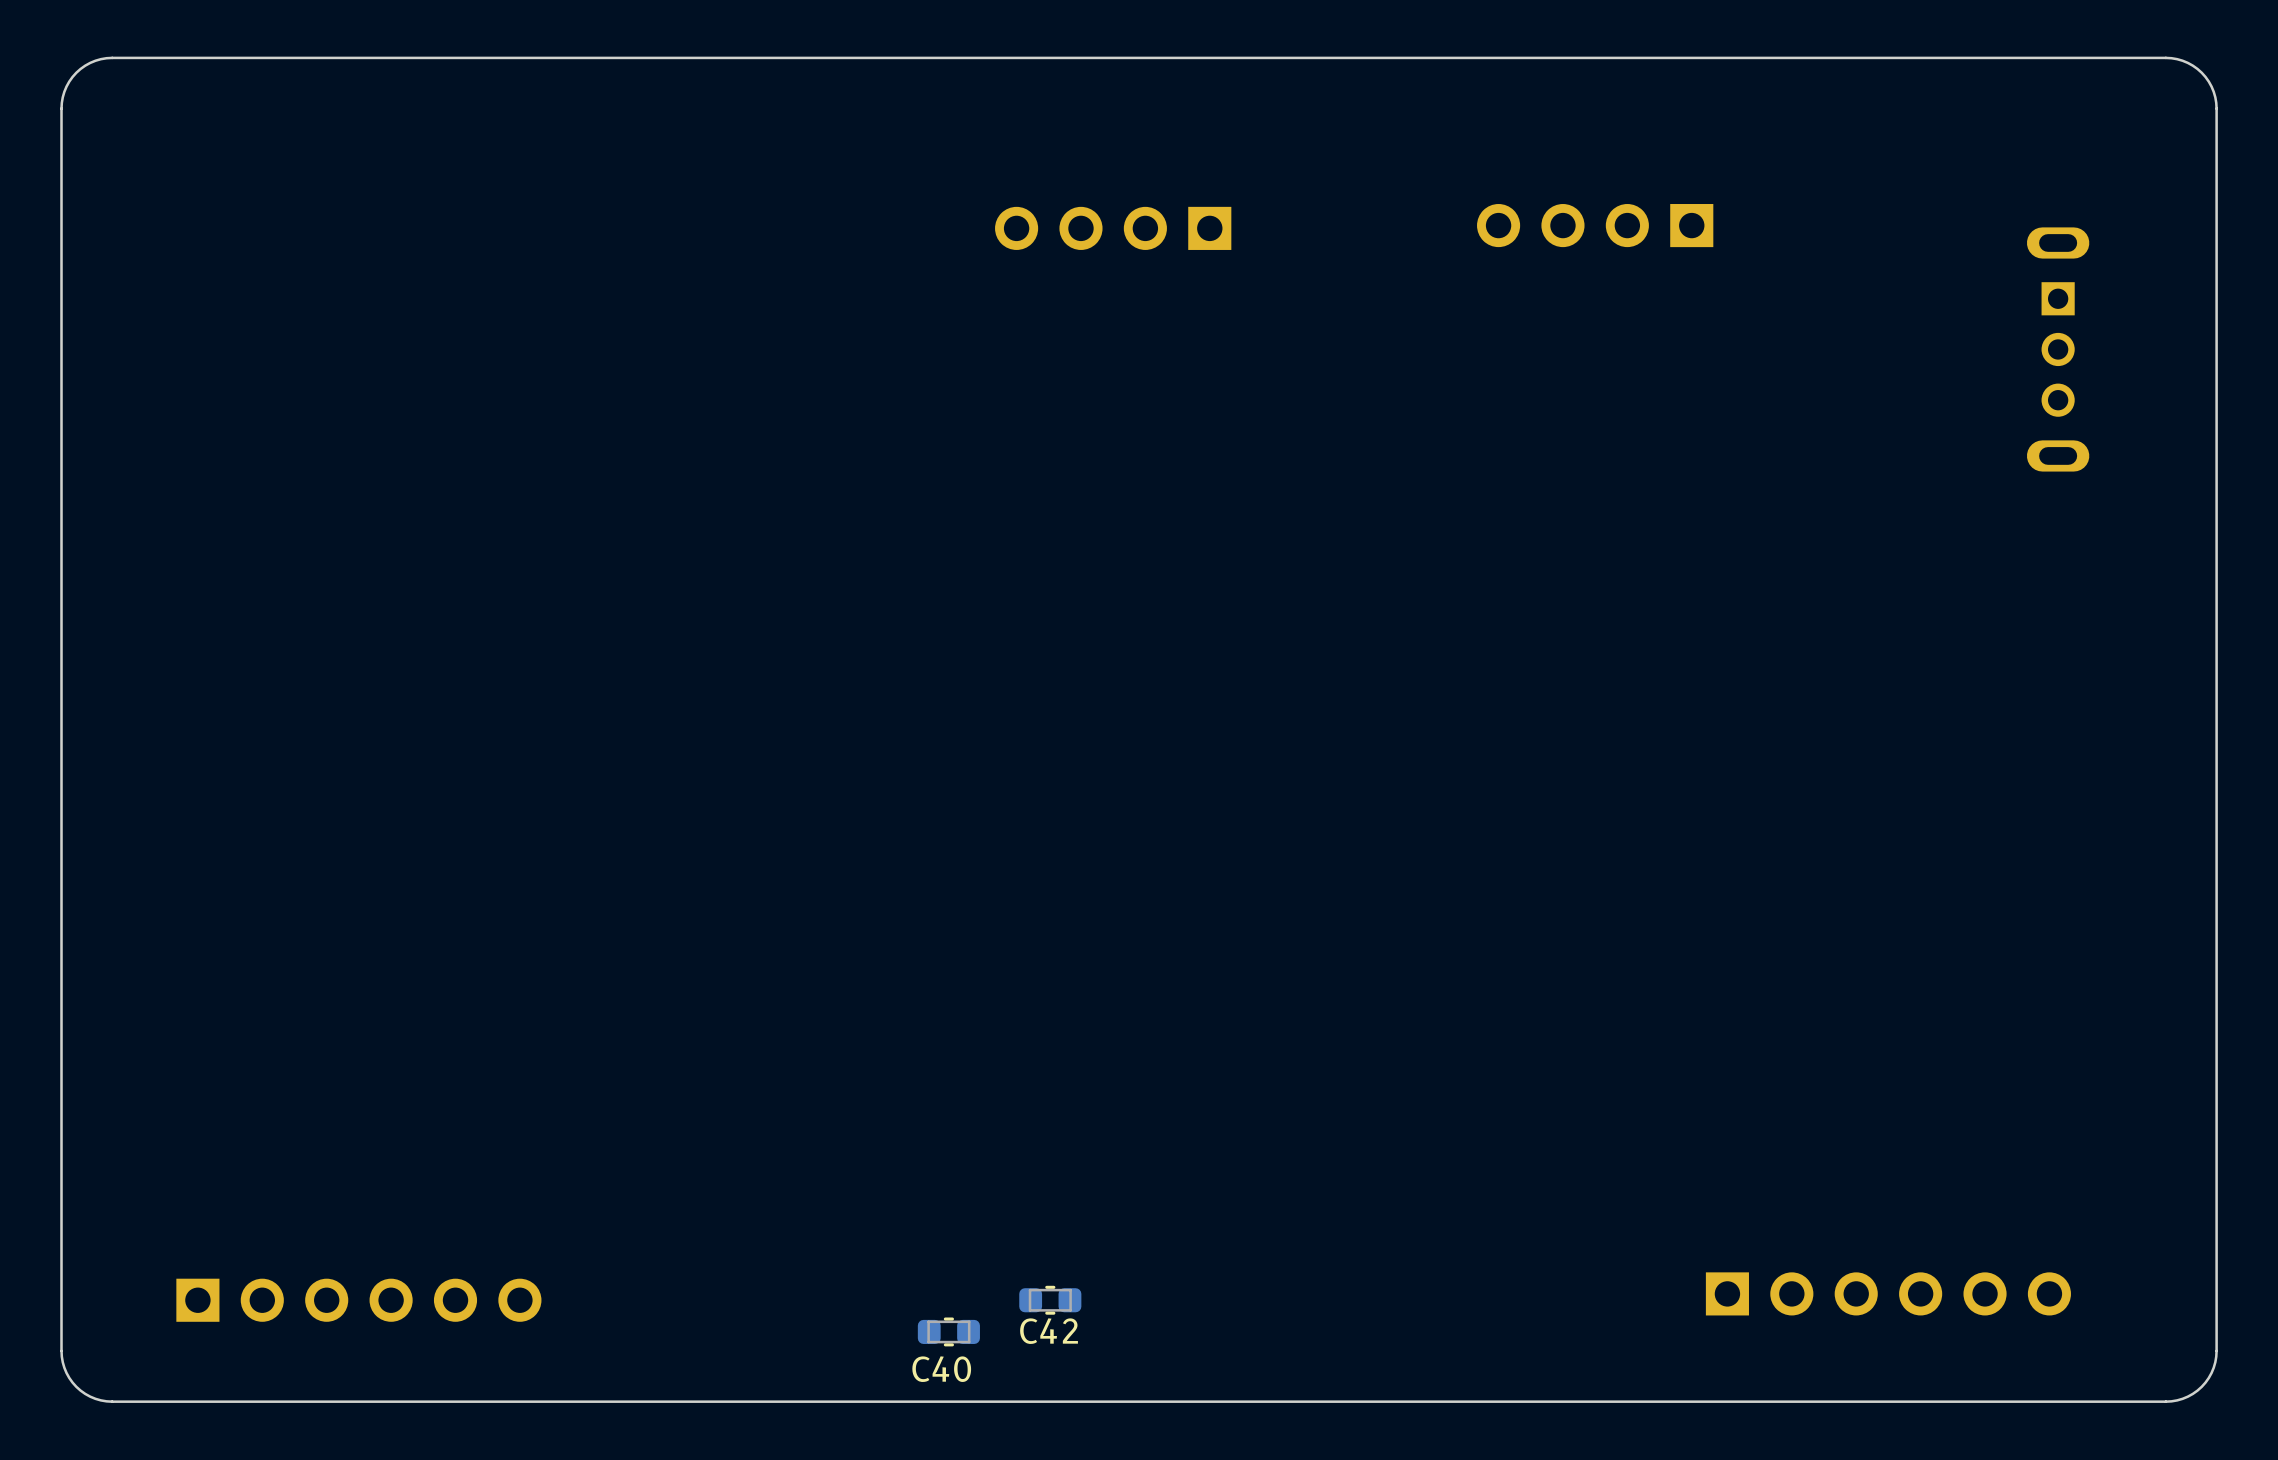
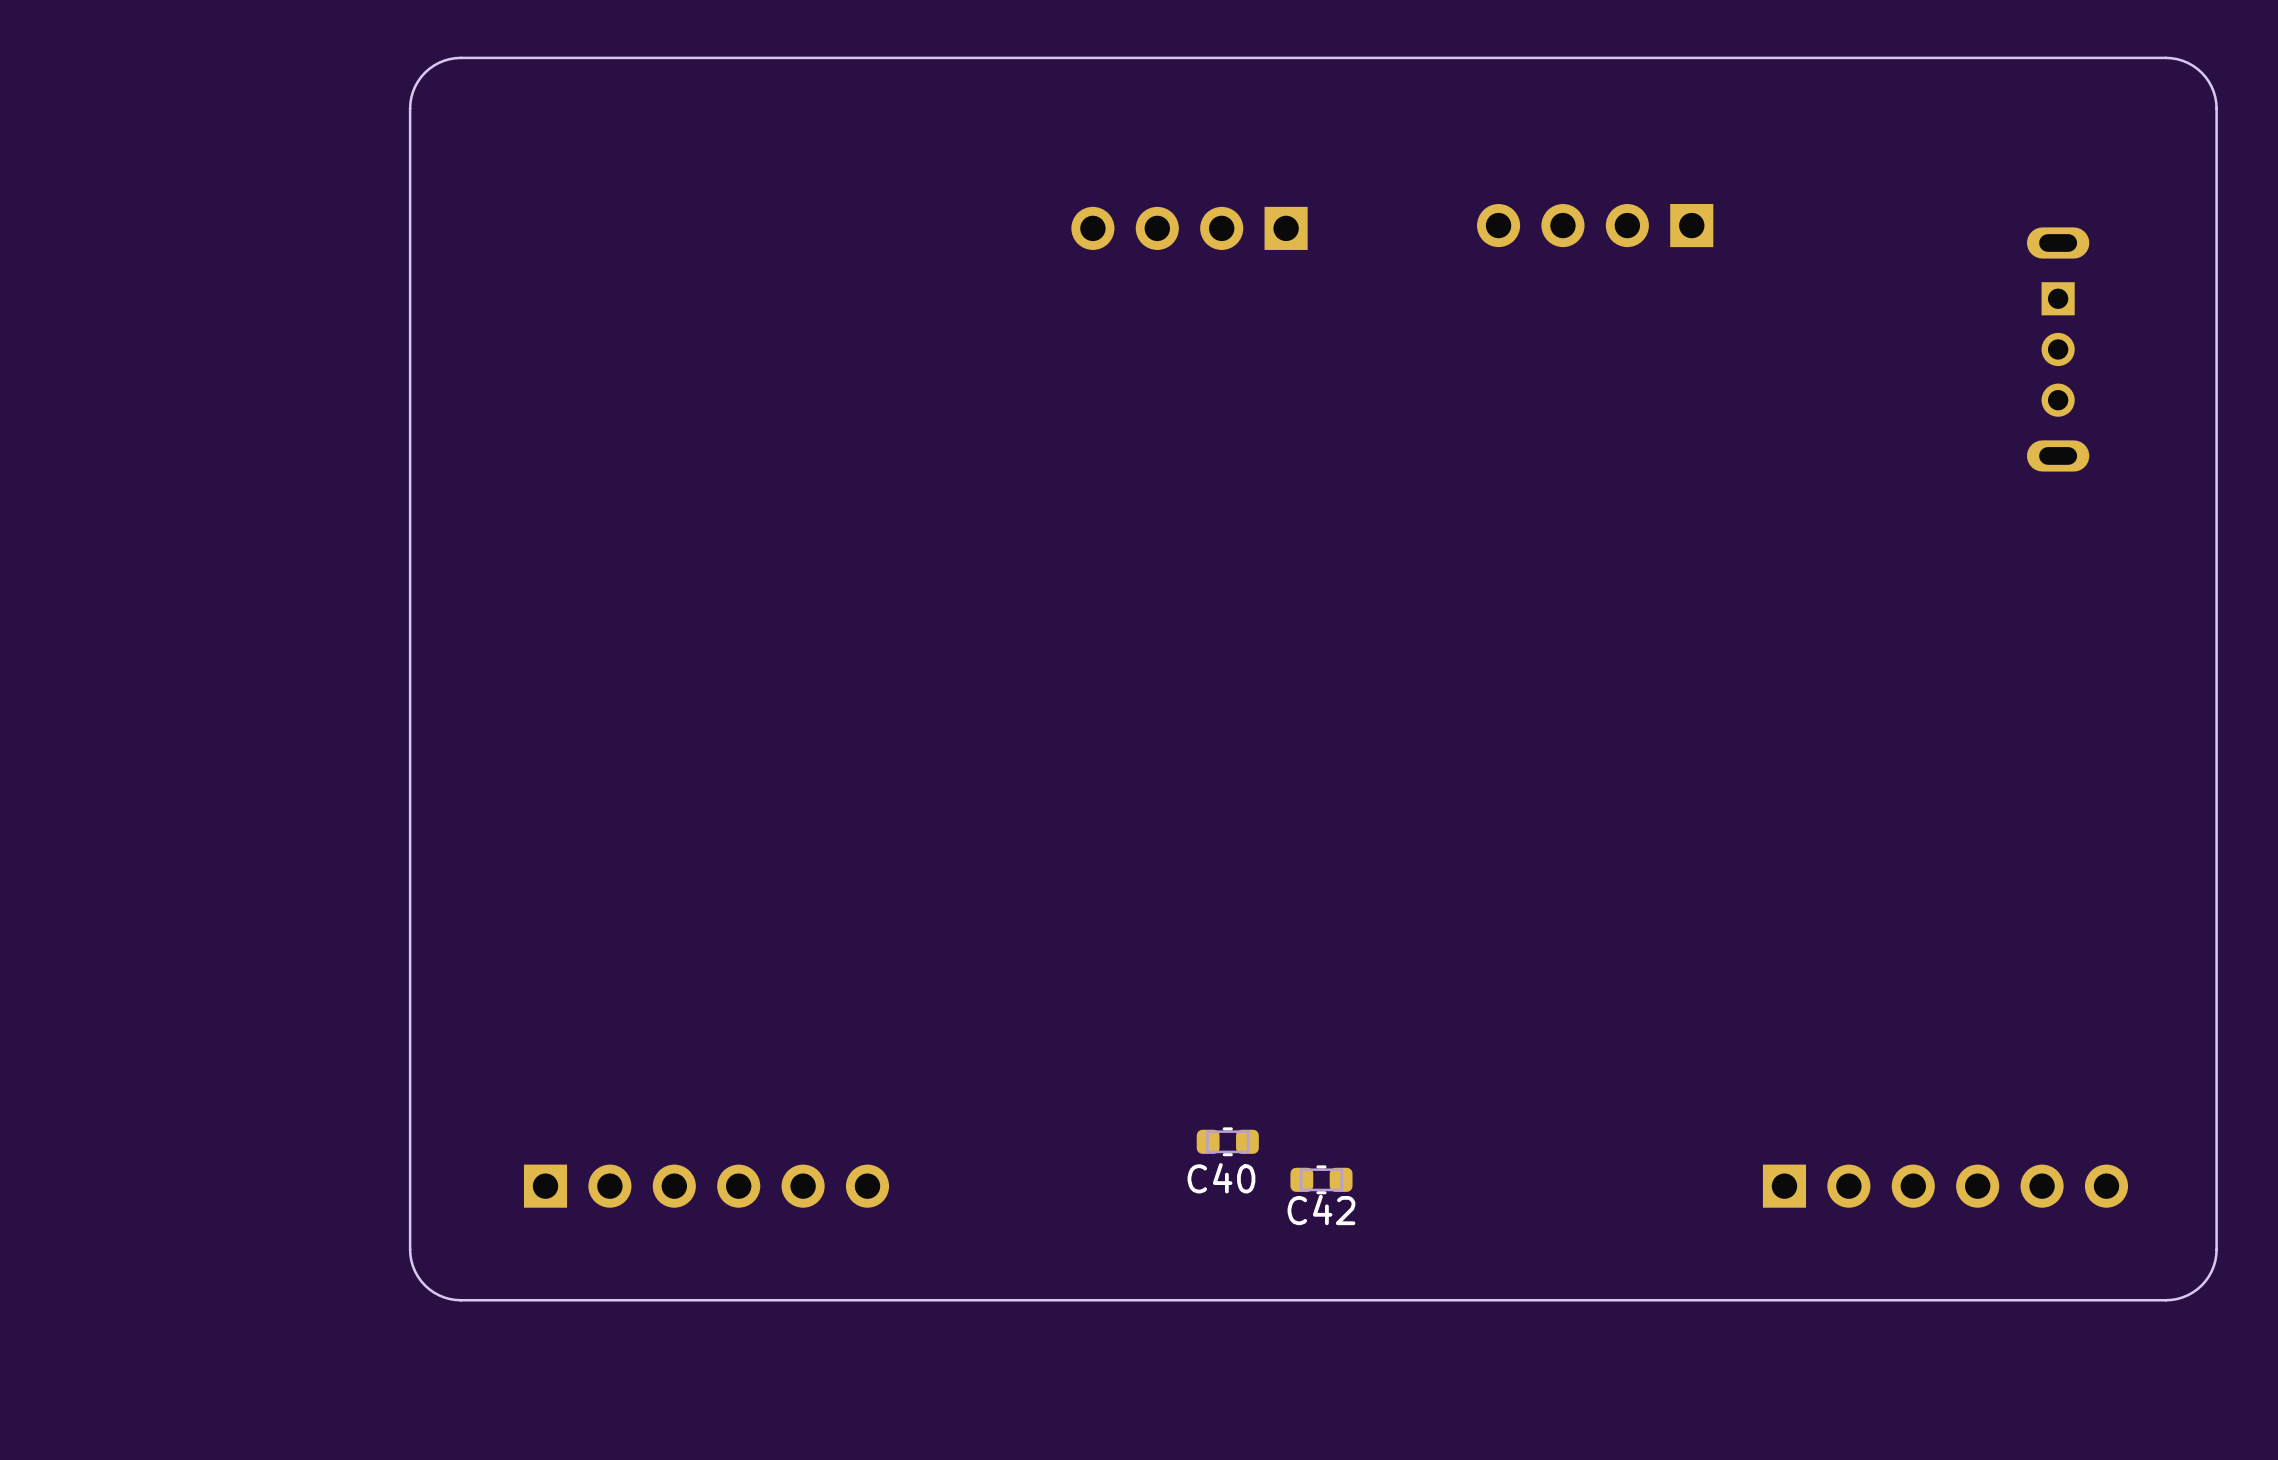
board edge: (460, 57) (106, 58) (90, 62) (76, 72) (69, 81) (62, 97) (61, 1350) (66, 1372) (72, 1382) (85, 1393) (95, 1398) (112, 1401) (2171, 1401) (2182, 1398) (2197, 1390) (2205, 1382) (2213, 1367) (2216, 1350) (2216, 1249) -> (460, 57) (444, 60) (424, 72) (415, 86) (410, 108) (410, 1249) (412, 1266) (417, 1276) (433, 1292) (444, 1297) (460, 1300) (2165, 1300) (2182, 1297) (2201, 1285) (2211, 1271) (2216, 1249)
part position: (1113, 228) -> (1189, 228)
part position: (1888, 1293) -> (1945, 1186)
part position: (358, 1300) -> (706, 1186)
C42 position: (1050, 1300) -> (1321, 1179)
C40 position: (948, 1331) -> (1227, 1141)

